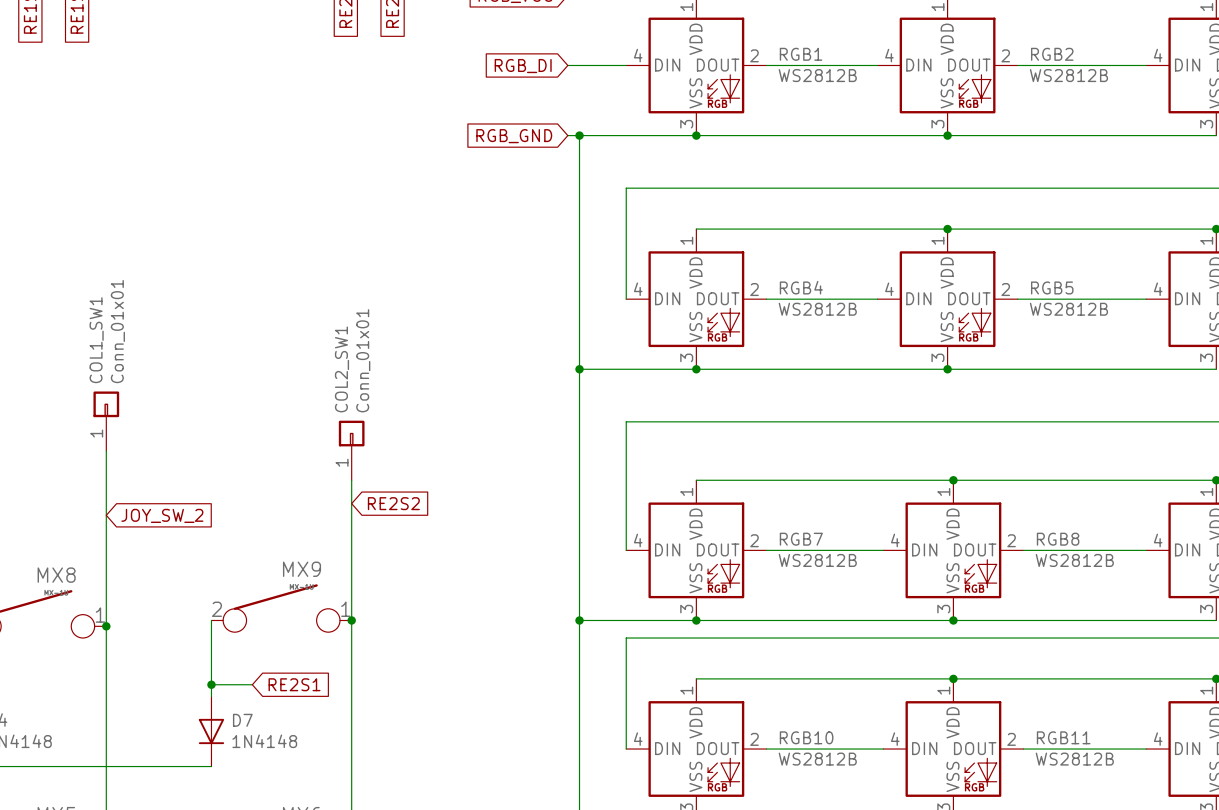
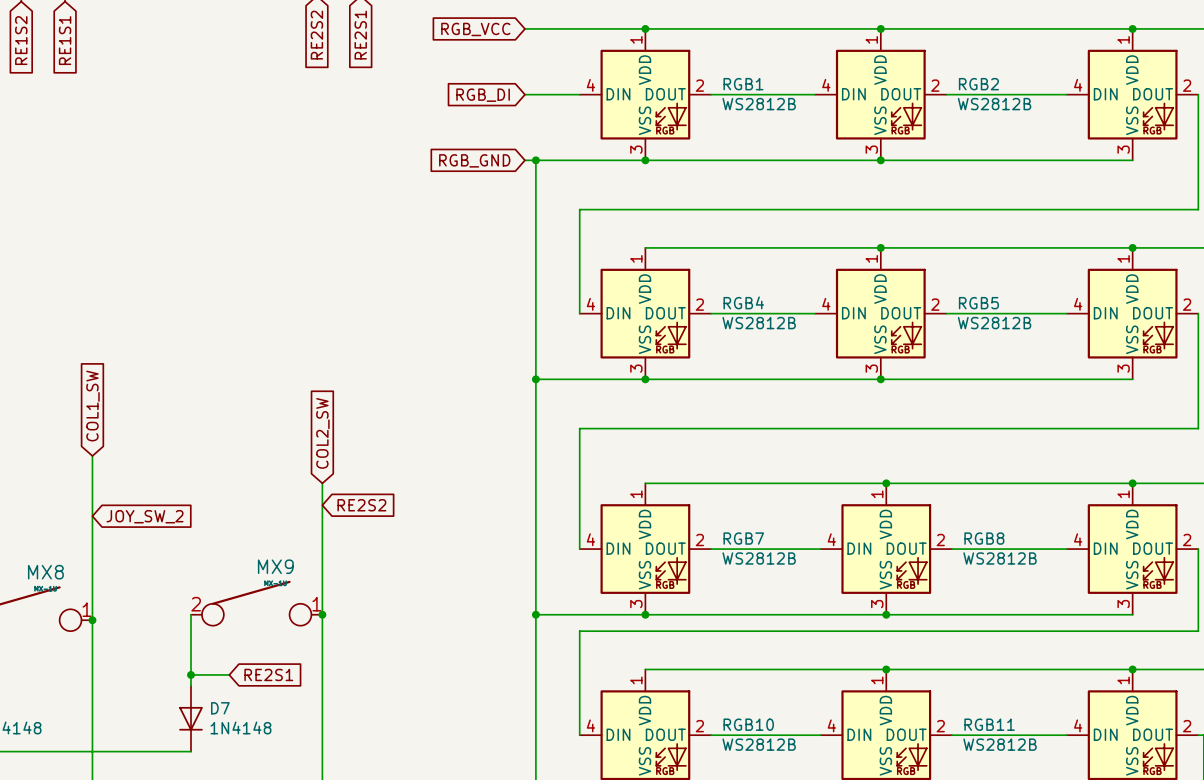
global label: none -> COL1_SW (92, 406)
COL1_SW1: Conn_01x01 (106, 421) -> none
global label: none -> COL2_SW (322, 433)
COL2_SW1: Conn_01x01 (351, 450) -> none

